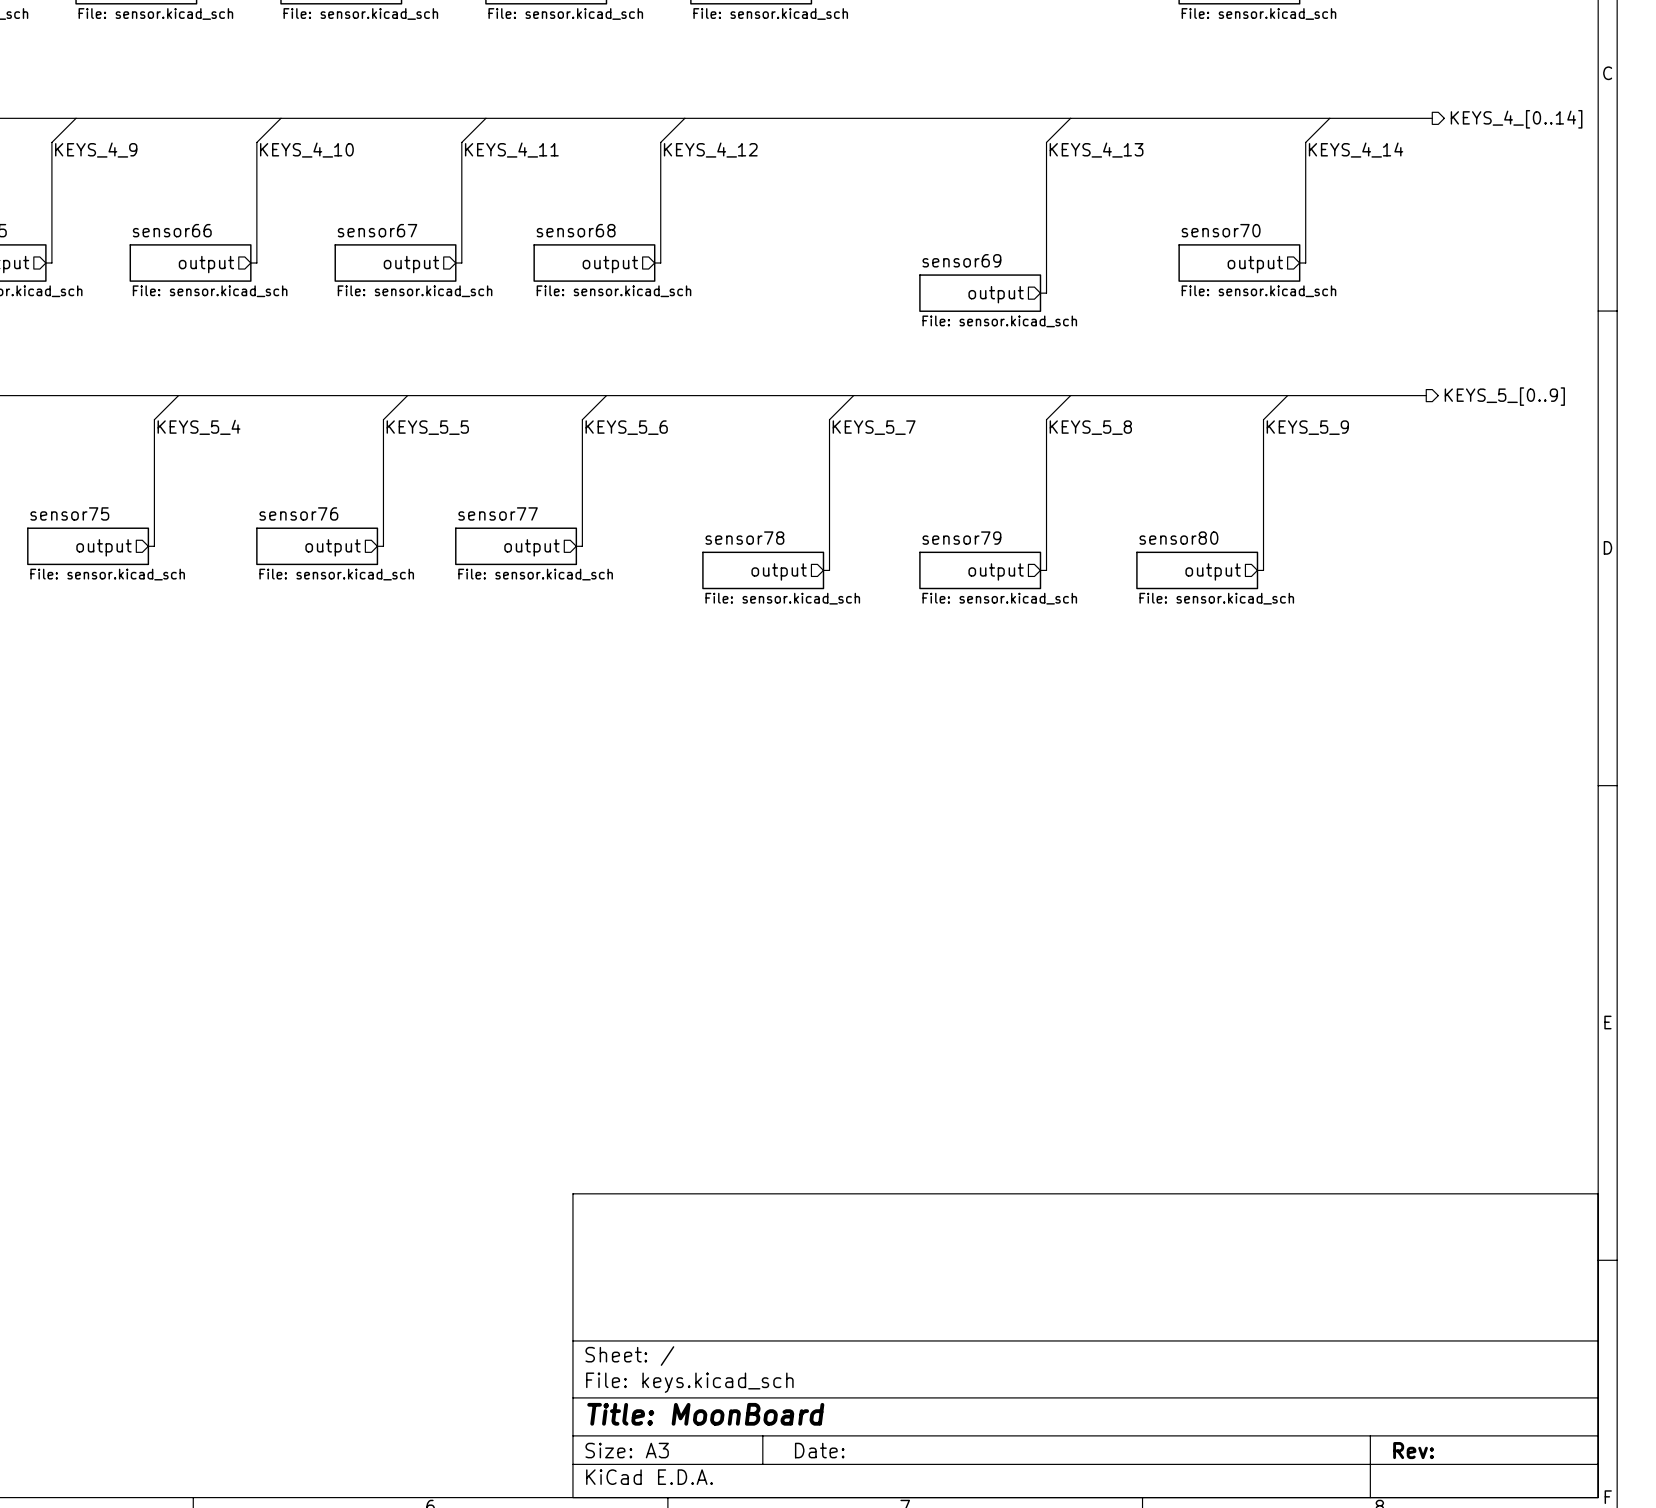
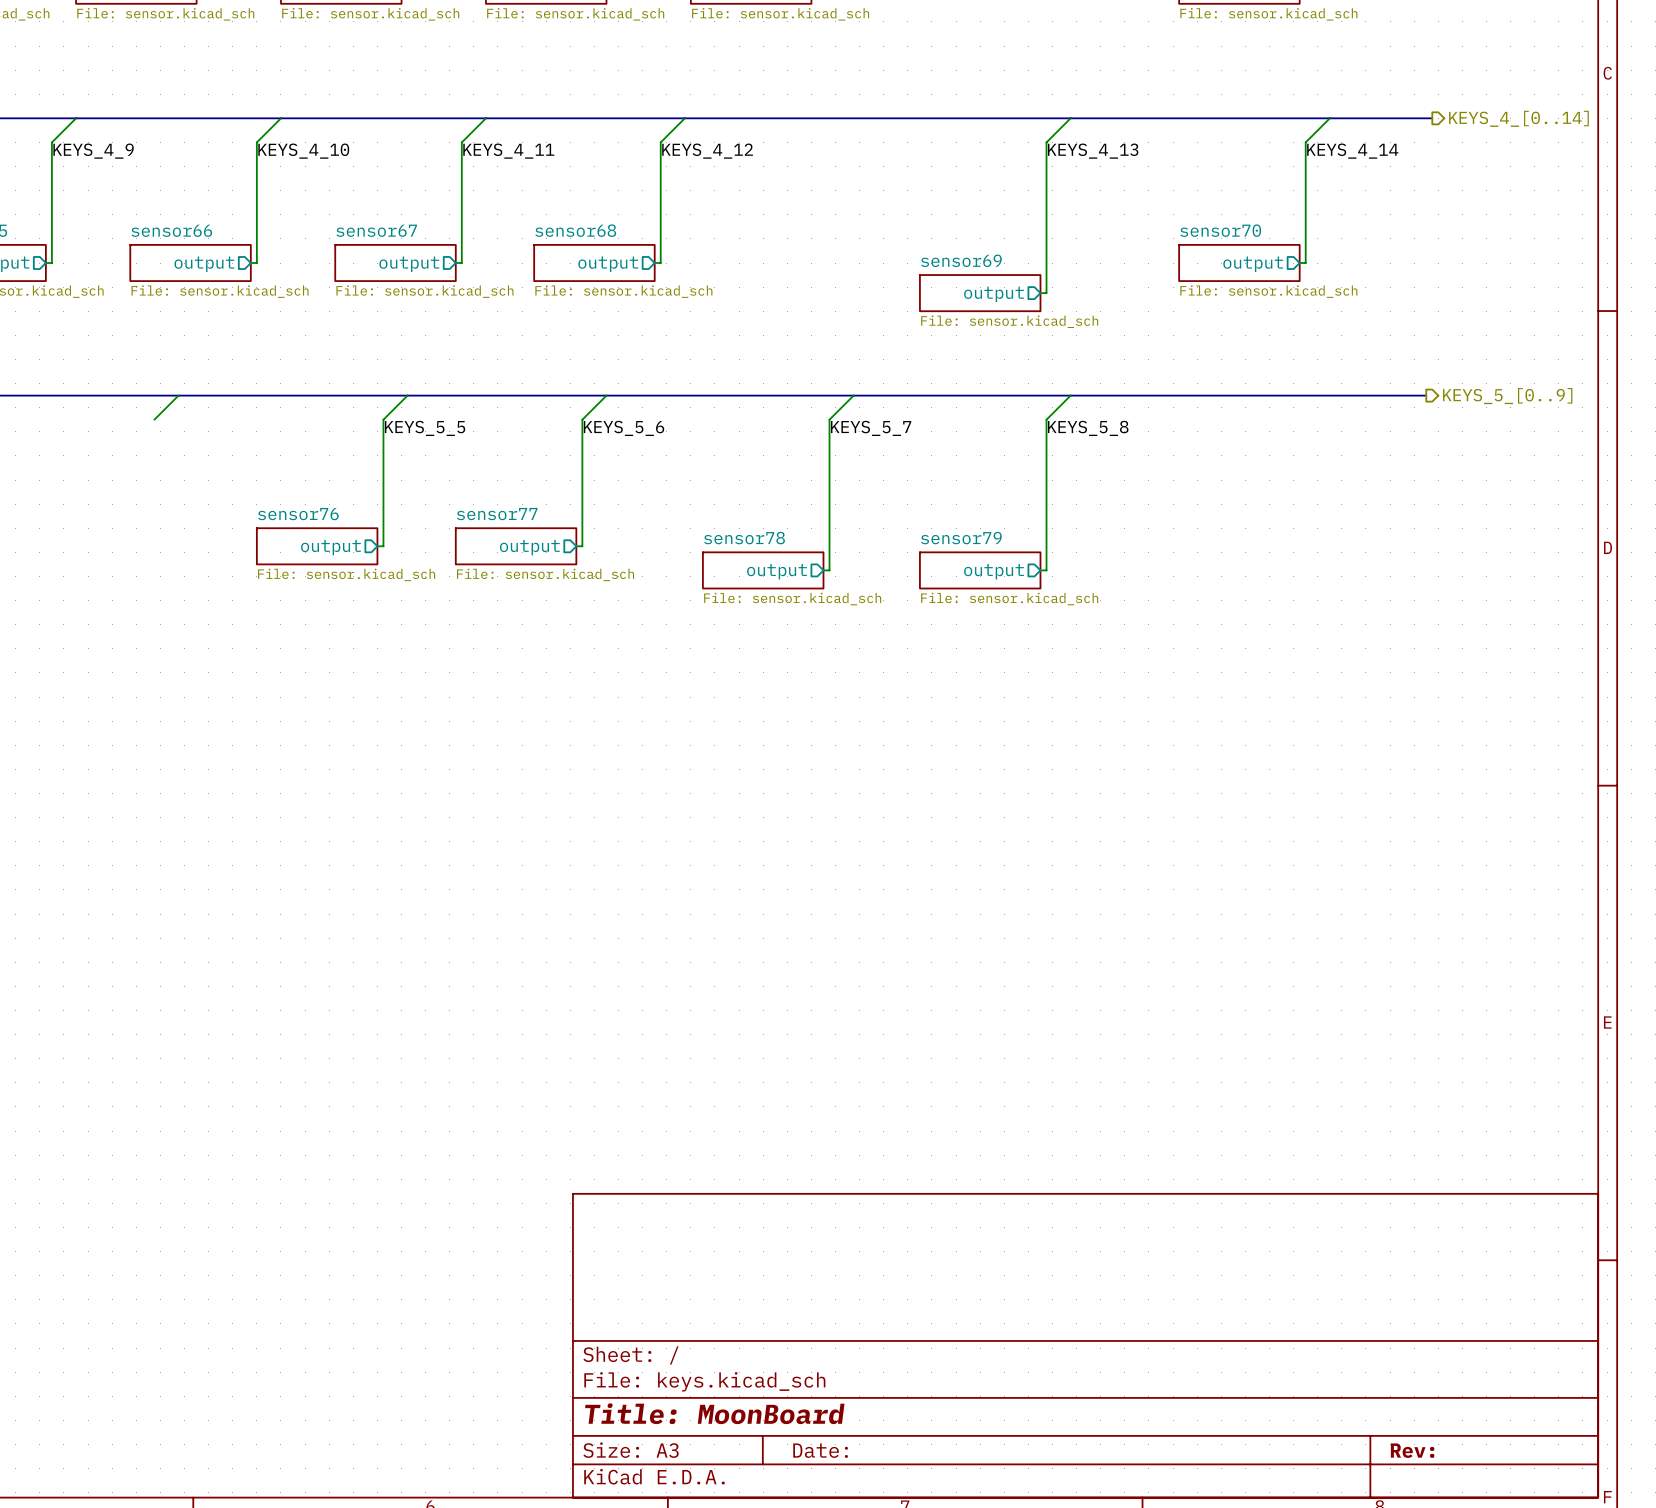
wire: (1287, 395) (1263, 419) (1263, 570) (1257, 570) -> none
wire: (154, 419) (154, 546) (148, 546) -> none
label: KEYS_5_4 (198, 427) -> none
label: KEYS_5_9 (1307, 427) -> none
sheet sensor75: File: sensor.kicad_sch (88, 546) -> none
sheet pin: output (103, 547) -> none
sheet sensor80: File: sensor.kicad_sch (1197, 570) -> none
sheet pin: output (1213, 571) -> none

